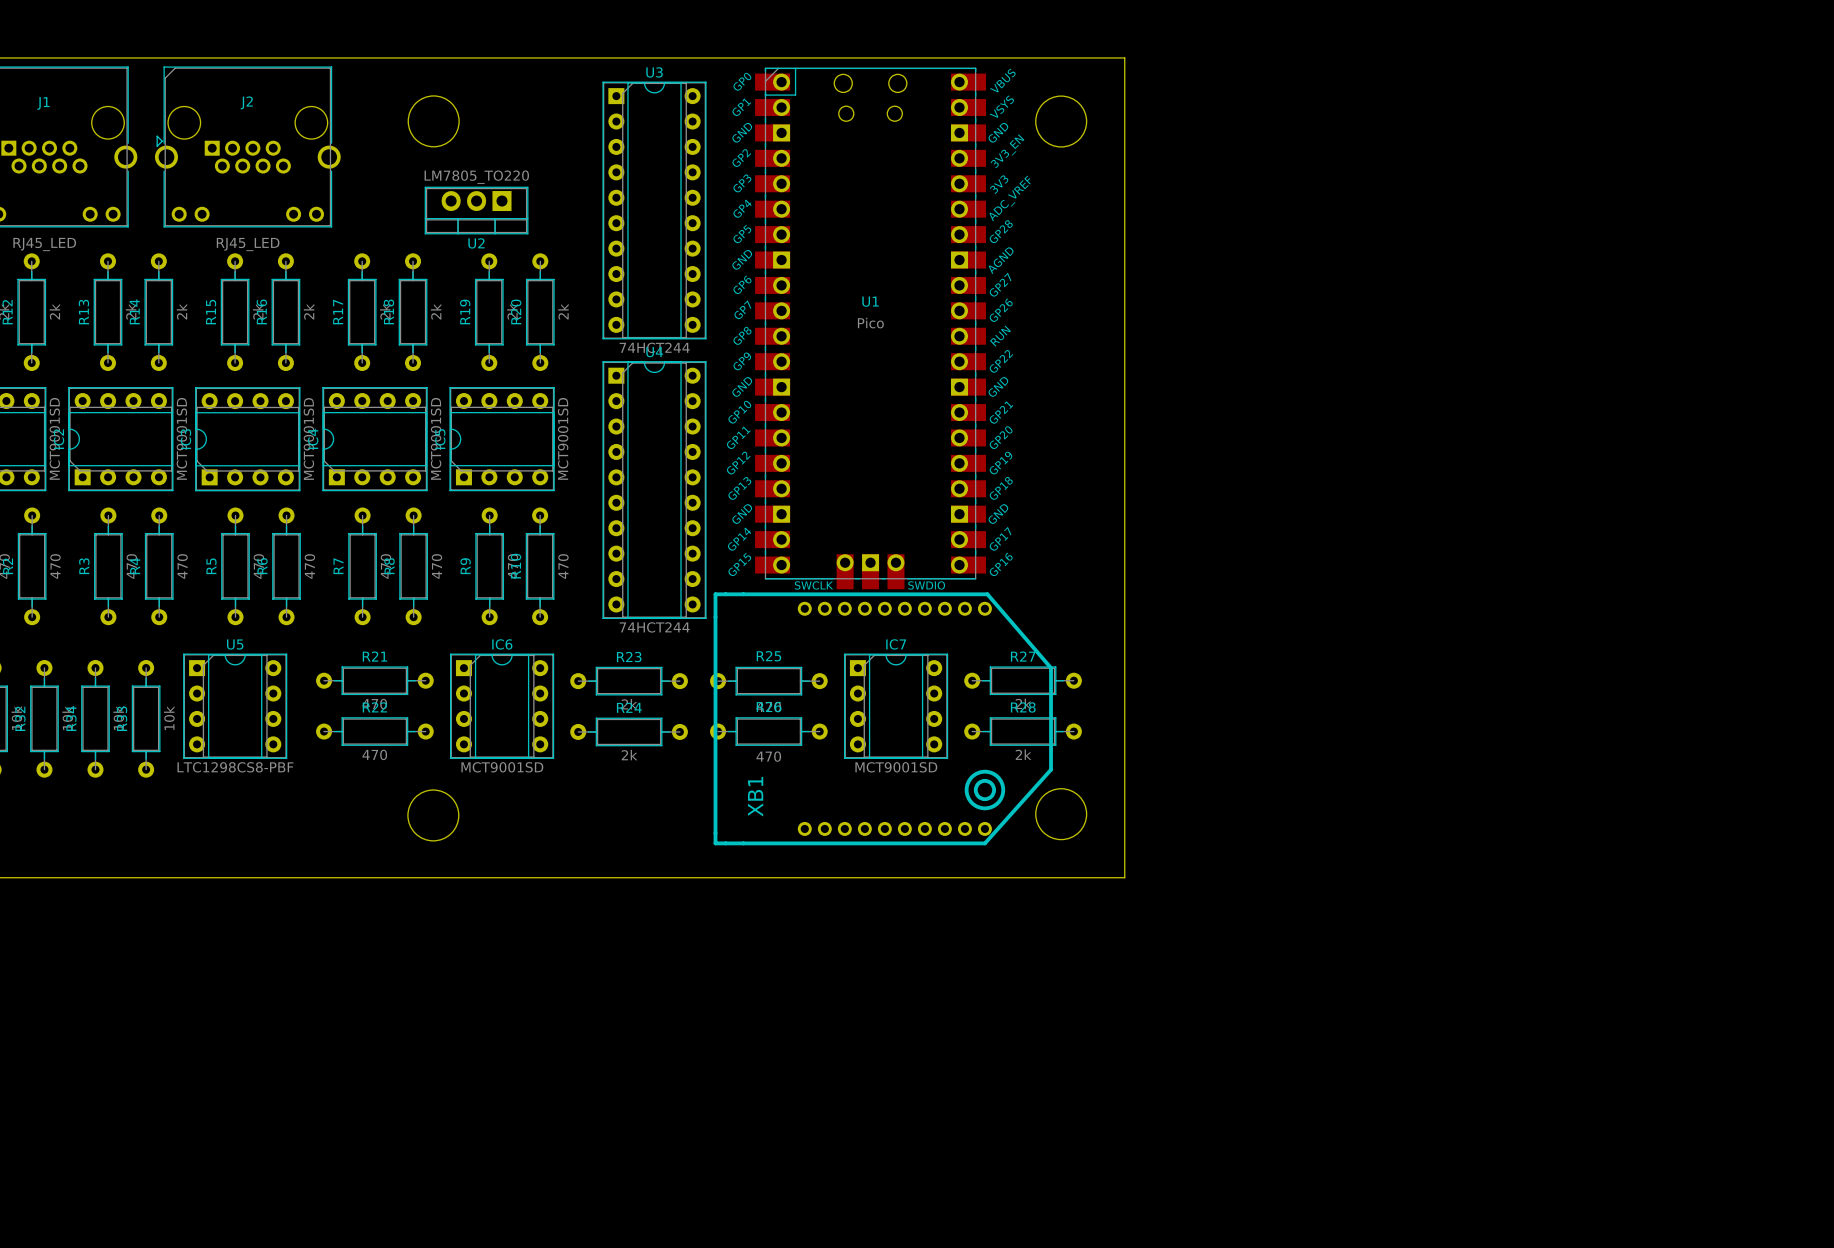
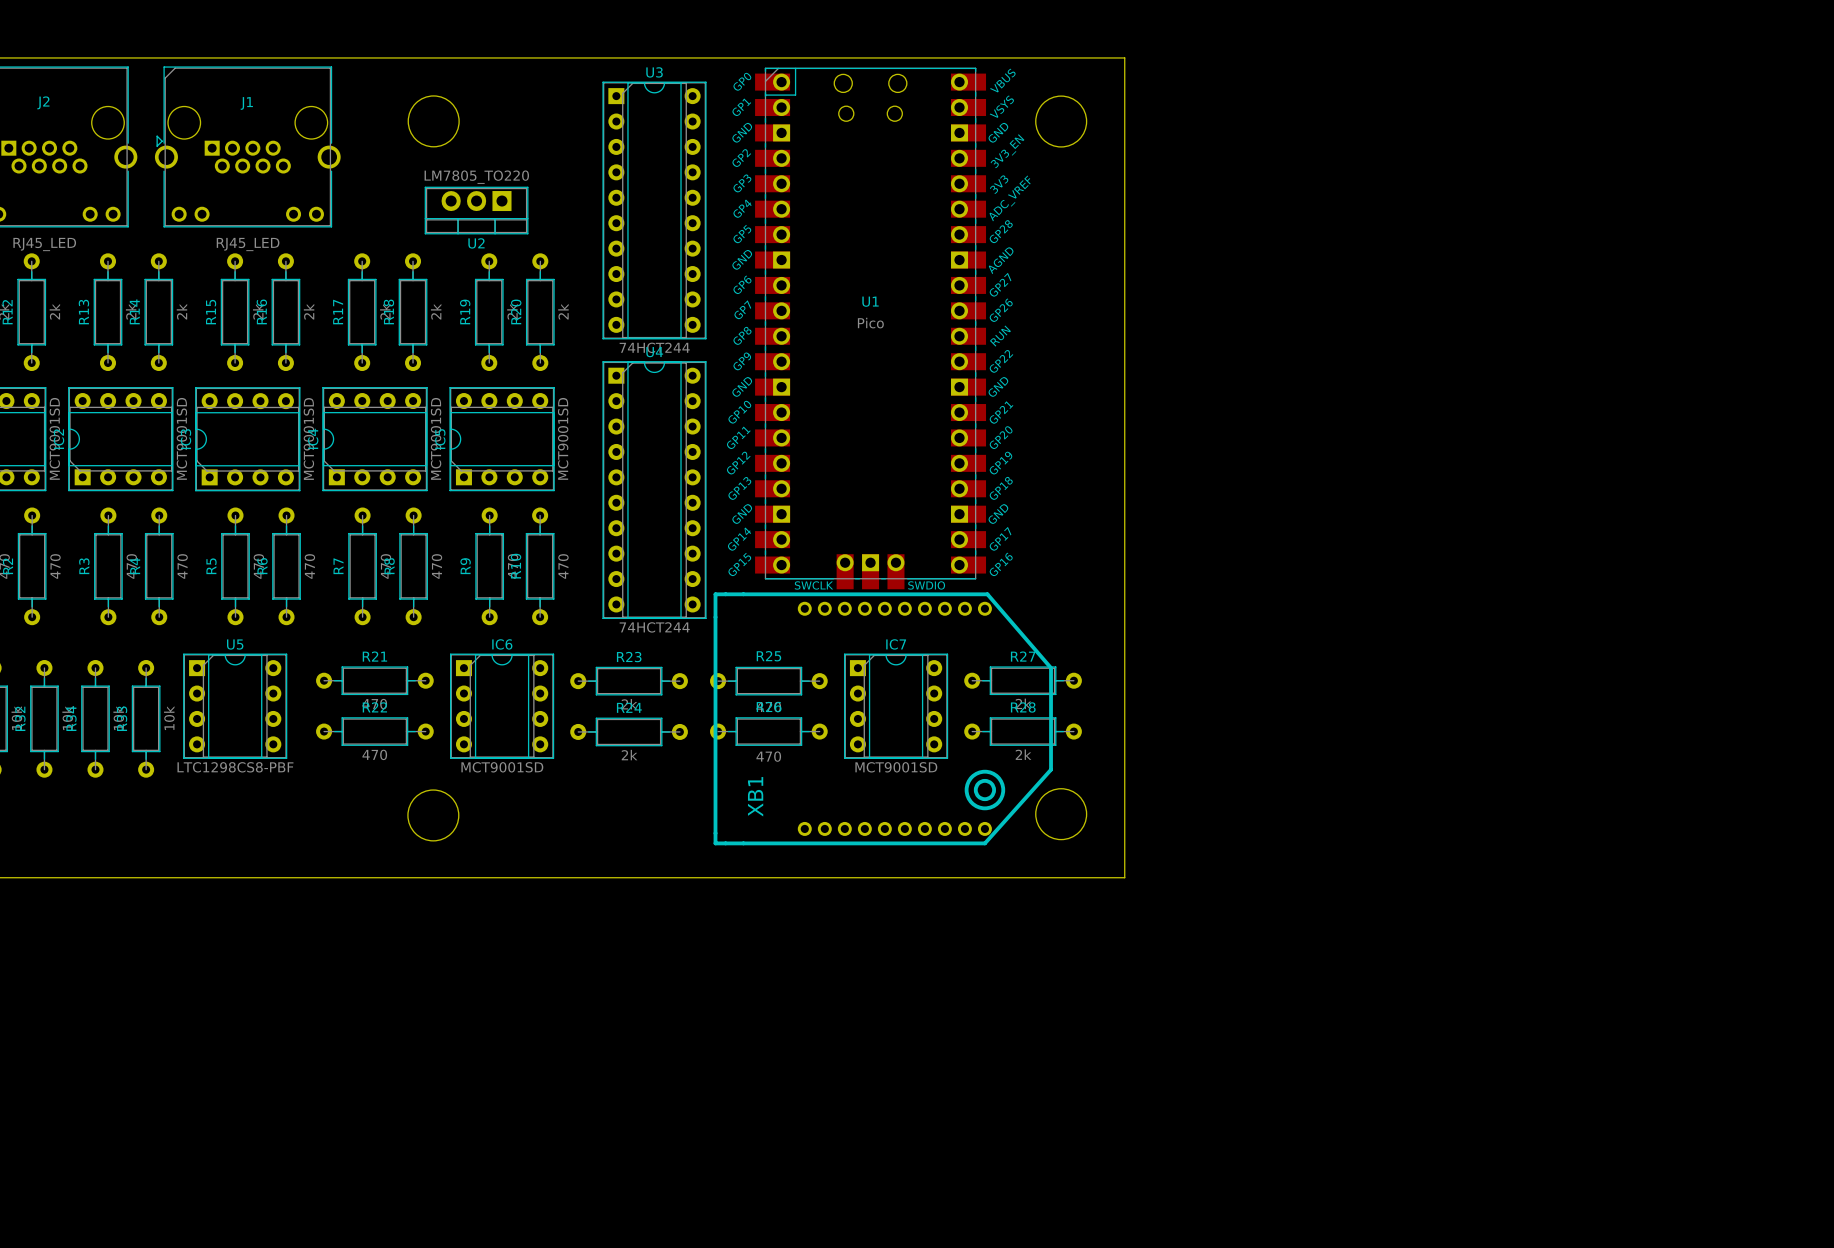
J2 name: J2 (246, 102) -> J1 (246, 103)
J1 name: J1 (43, 103) -> J2 (43, 102)

